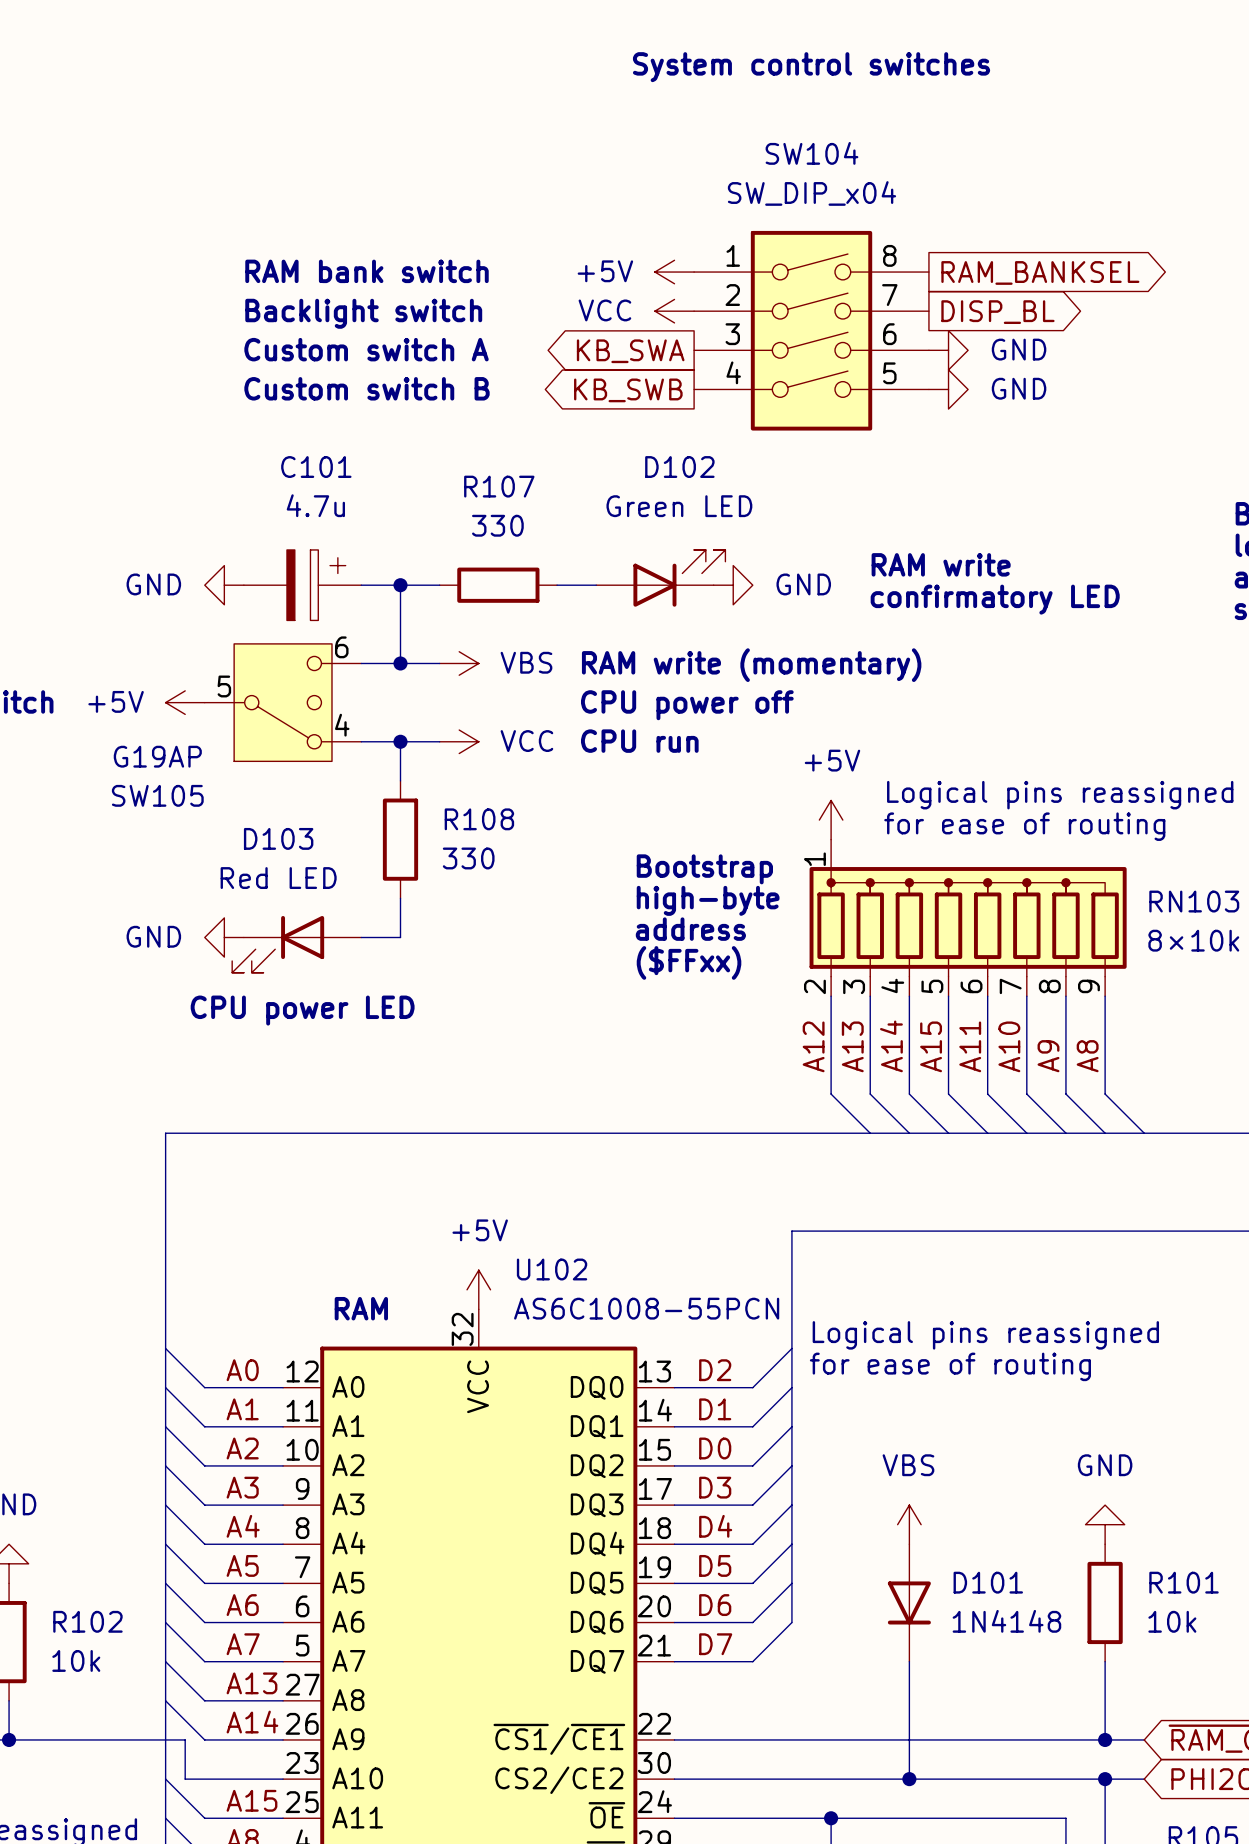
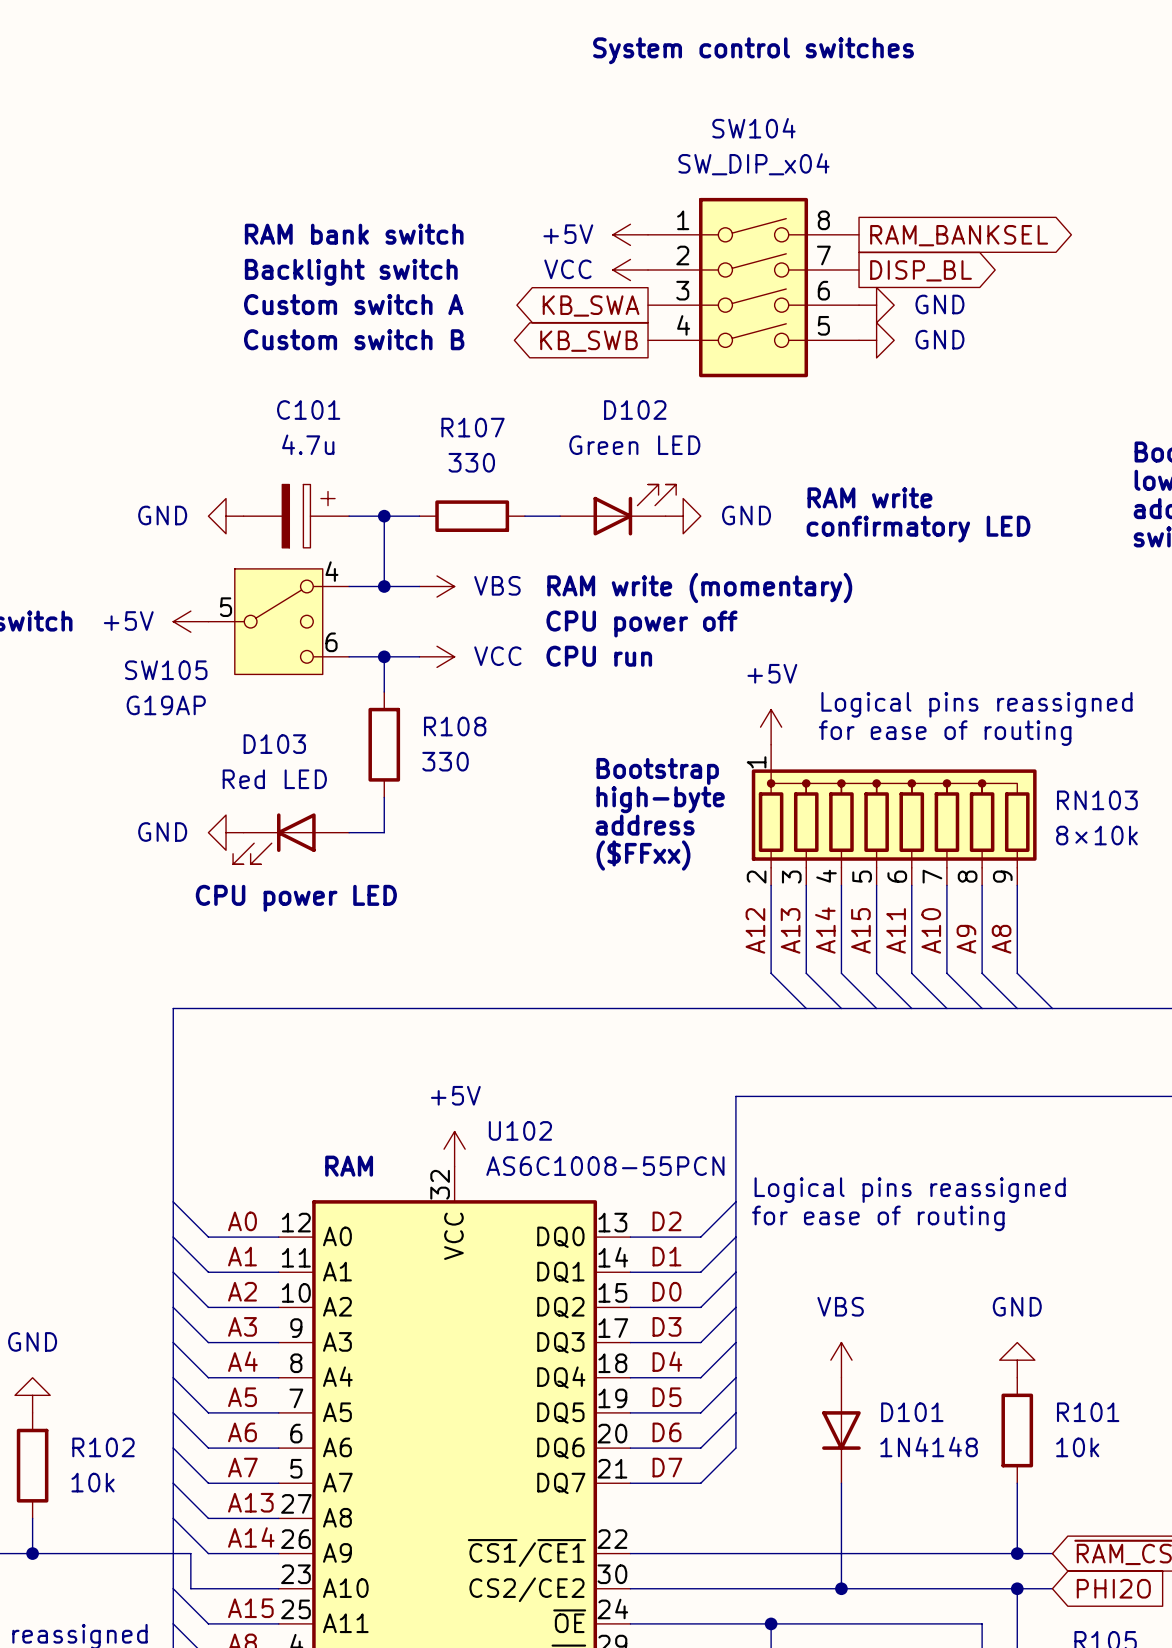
SW105 flip: as is (283, 702) -> up-down (278, 621)
SW105 value position: G19AP (157, 756) -> G19AP (166, 705)
SW105 name position: SW105 (157, 795) -> SW105 (166, 670)

